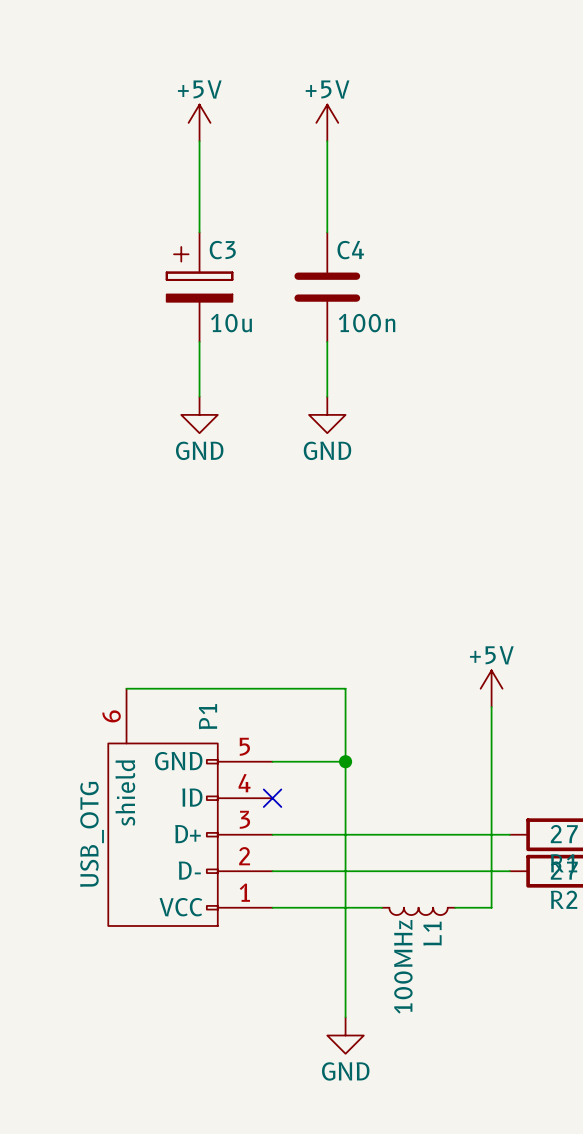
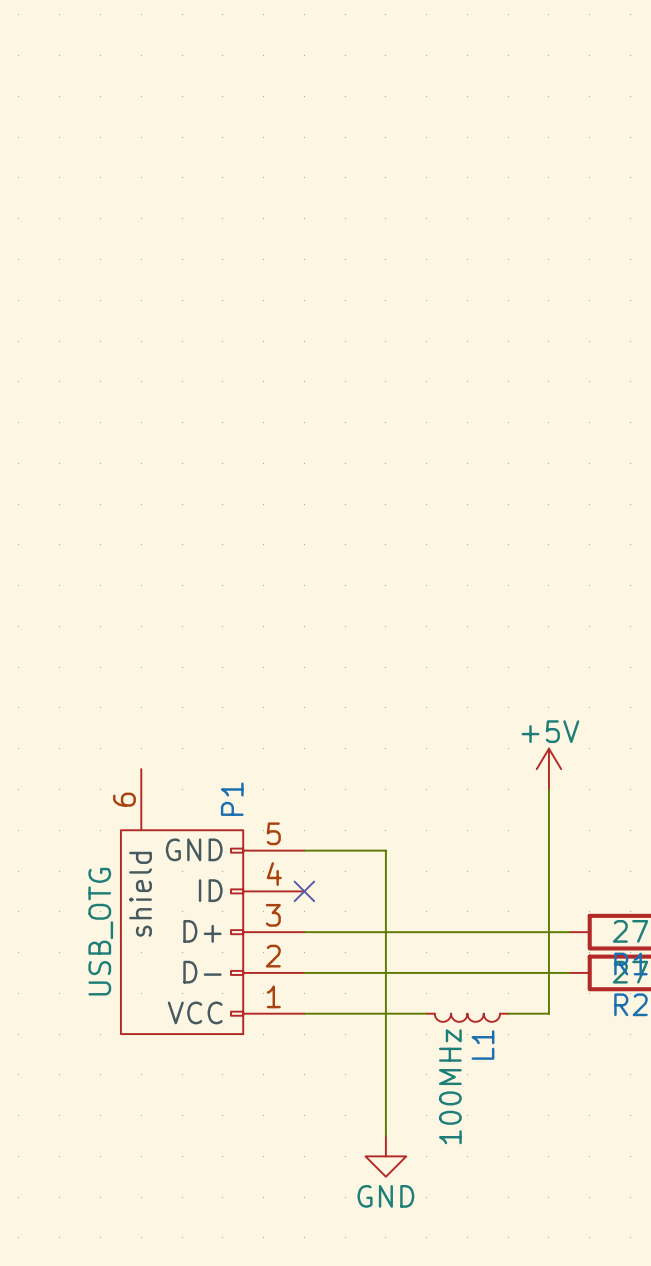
power symbol: +5V (199, 122) -> none
power symbol: +5V (327, 122) -> none
wire: (199, 141) (199, 232) -> none
wire: (327, 141) (327, 232) -> none
C3: 10u (199, 287) -> none
C4: 100n (327, 287) -> none
wire: (199, 341) (199, 396) -> none
wire: (327, 341) (327, 396) -> none
power symbol: GND (199, 414) -> none
power symbol: GND (327, 414) -> none
wire: (126, 688) (345, 688) (345, 761) -> none
junction: (345, 761) -> none

